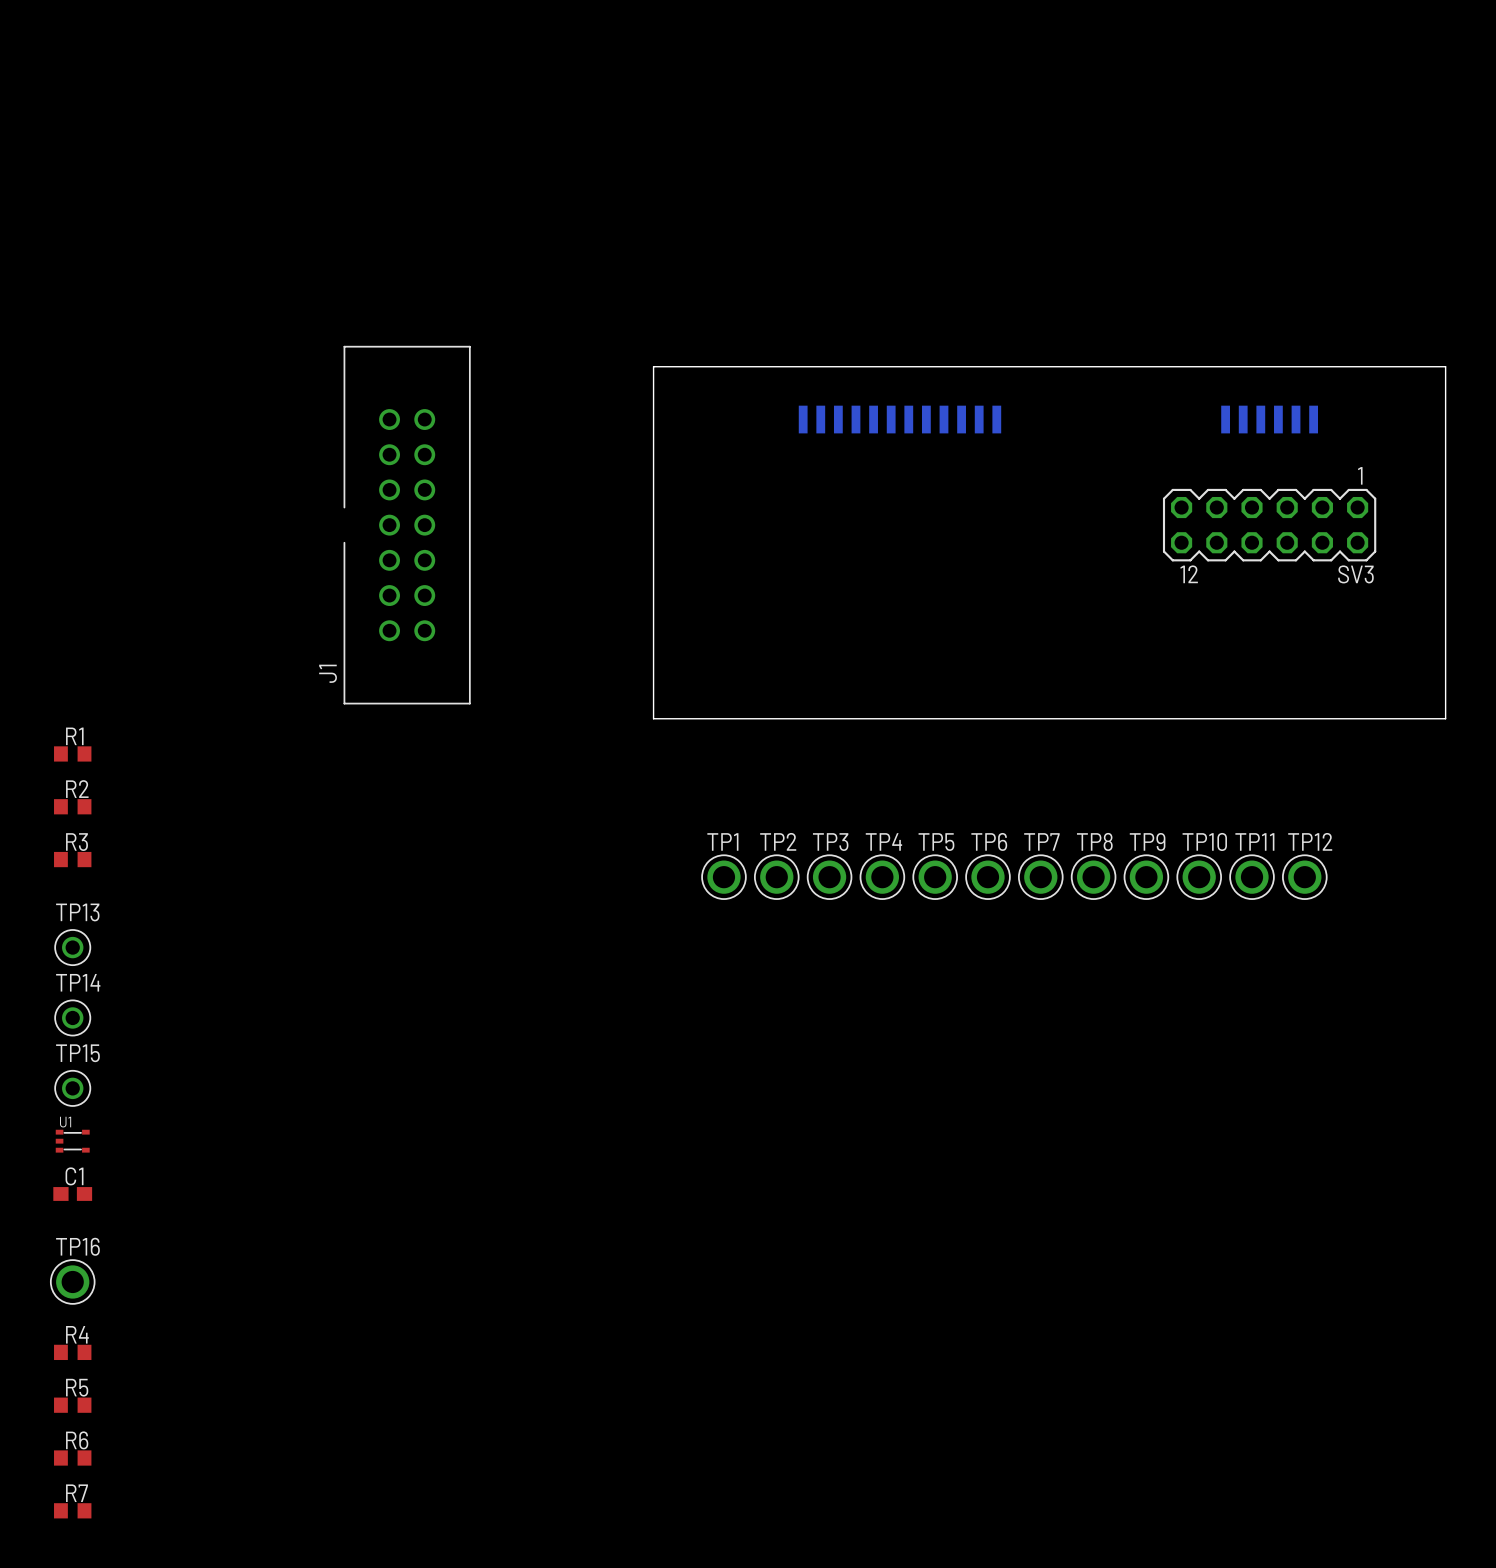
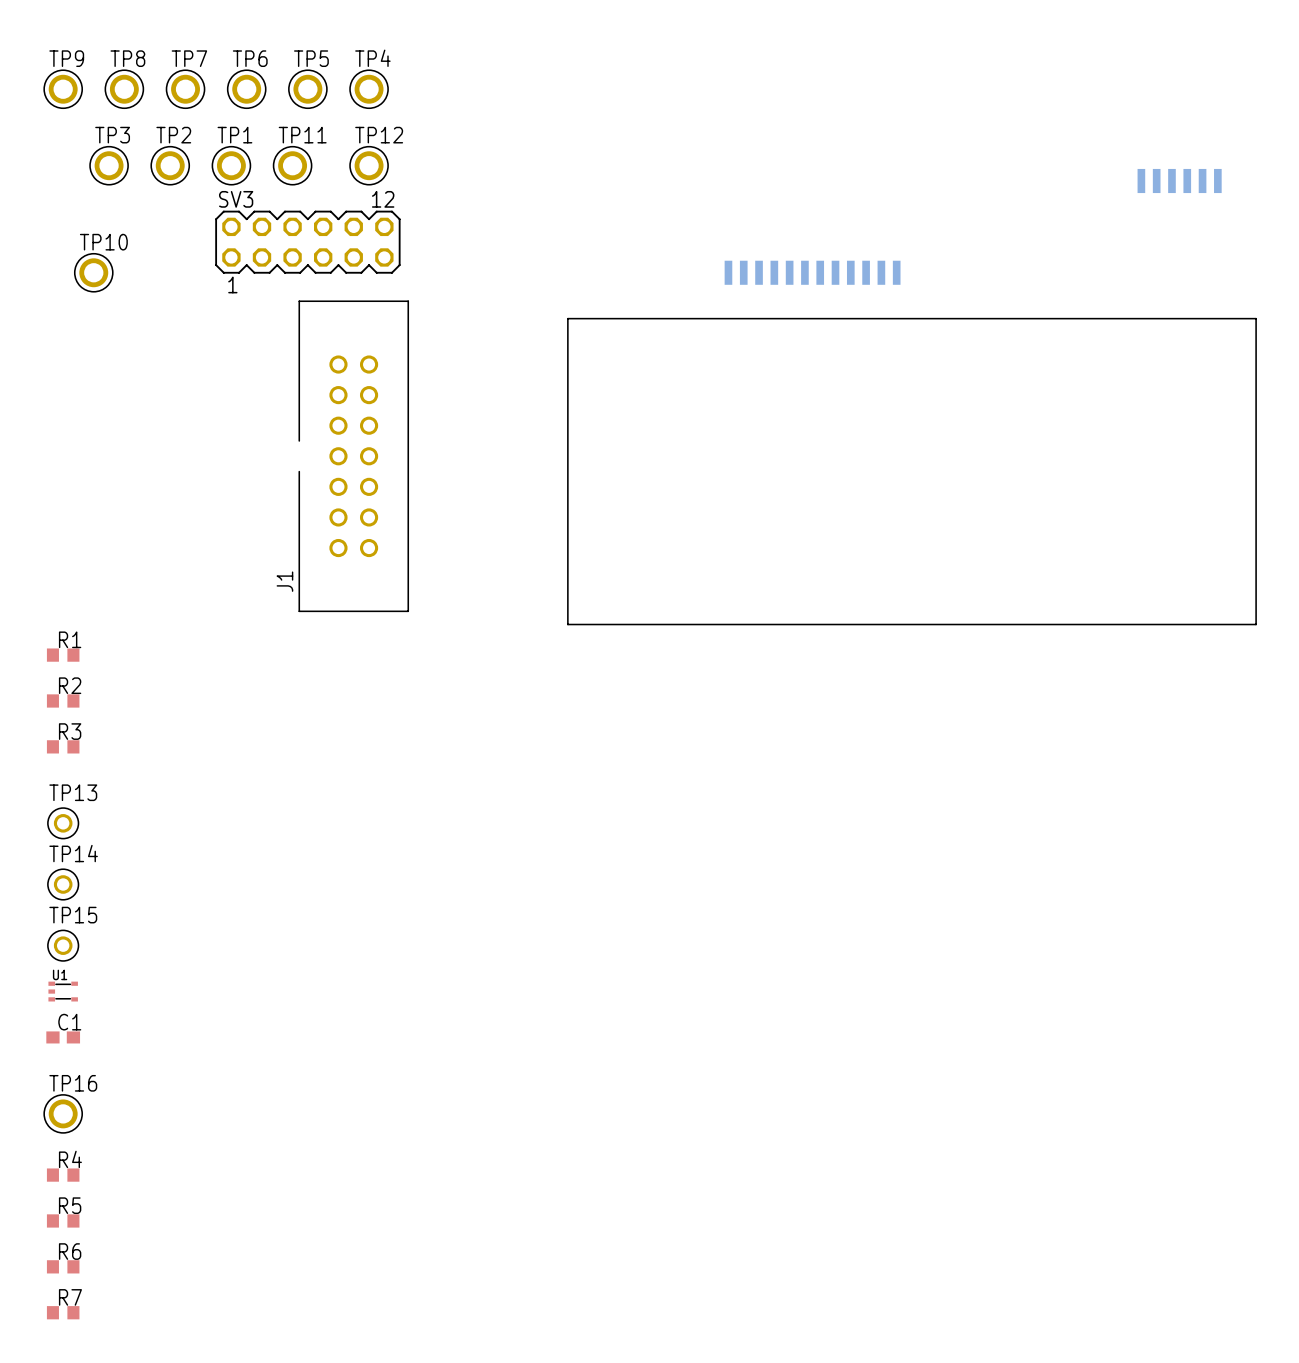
part position: (899, 419) -> (812, 272)
part position: (1269, 419) -> (1179, 181)
SV3 text position: 1 (1360, 475) -> 1 (232, 284)
SV3 position: (1269, 525) -> (307, 242)
SV3 text position: 12 (1189, 574) -> 12 (383, 199)
SV3 name position: SV3 (1355, 574) -> SV3 (236, 199)
TP1 position: (723, 877) -> (231, 165)
TP2 position: (776, 877) -> (170, 165)
TP3 position: (829, 877) -> (109, 165)
TP4 position: (882, 877) -> (369, 89)
TP5 position: (935, 877) -> (307, 89)
TP6 position: (987, 877) -> (246, 89)
TP7 position: (1040, 877) -> (185, 89)
TP8 position: (1093, 877) -> (124, 89)
TP9 position: (1146, 877) -> (63, 89)
TP10 position: (1199, 877) -> (93, 272)
TP11 position: (1252, 877) -> (292, 165)
TP12 position: (1304, 877) -> (369, 165)

